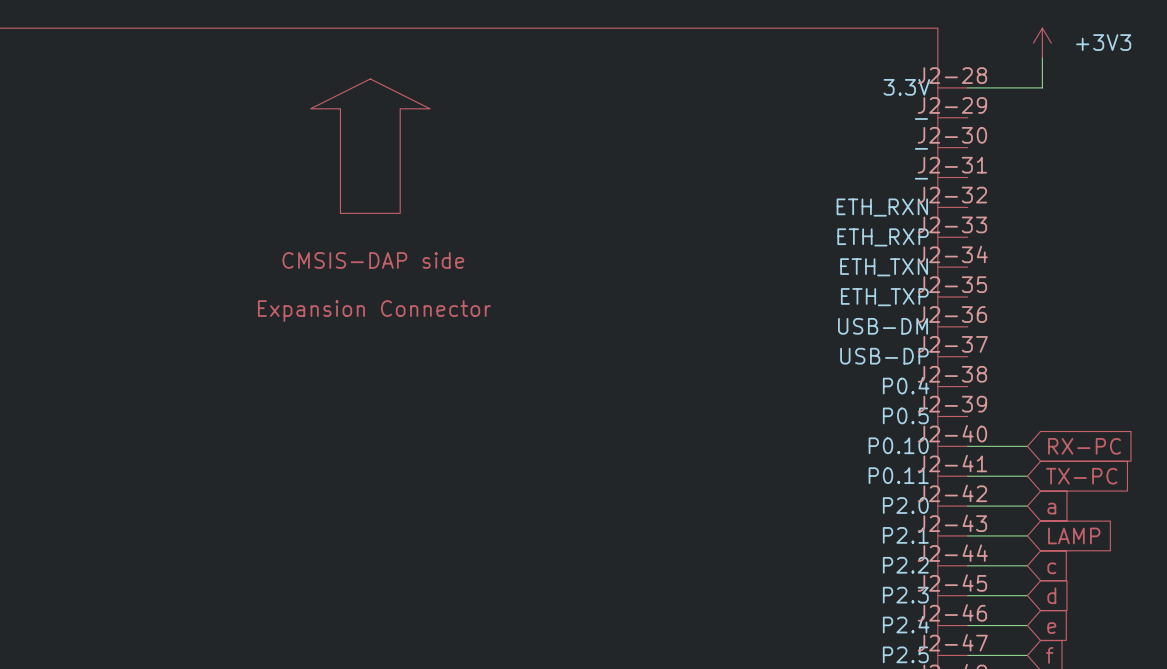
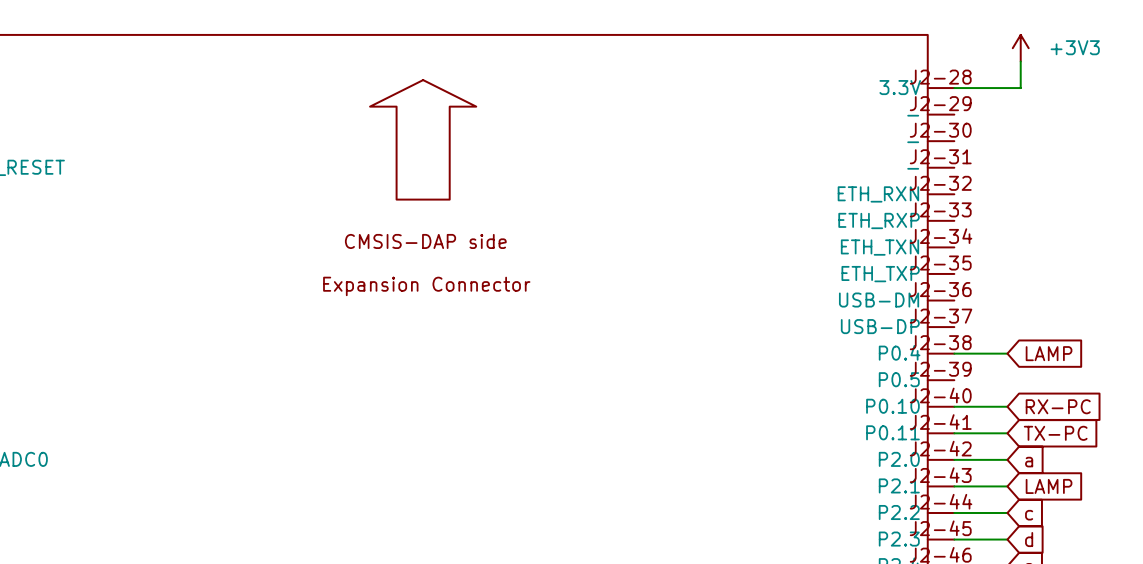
wire: none -> (954, 353) (1007, 353)
global label: none -> LAMP (1049, 353)

